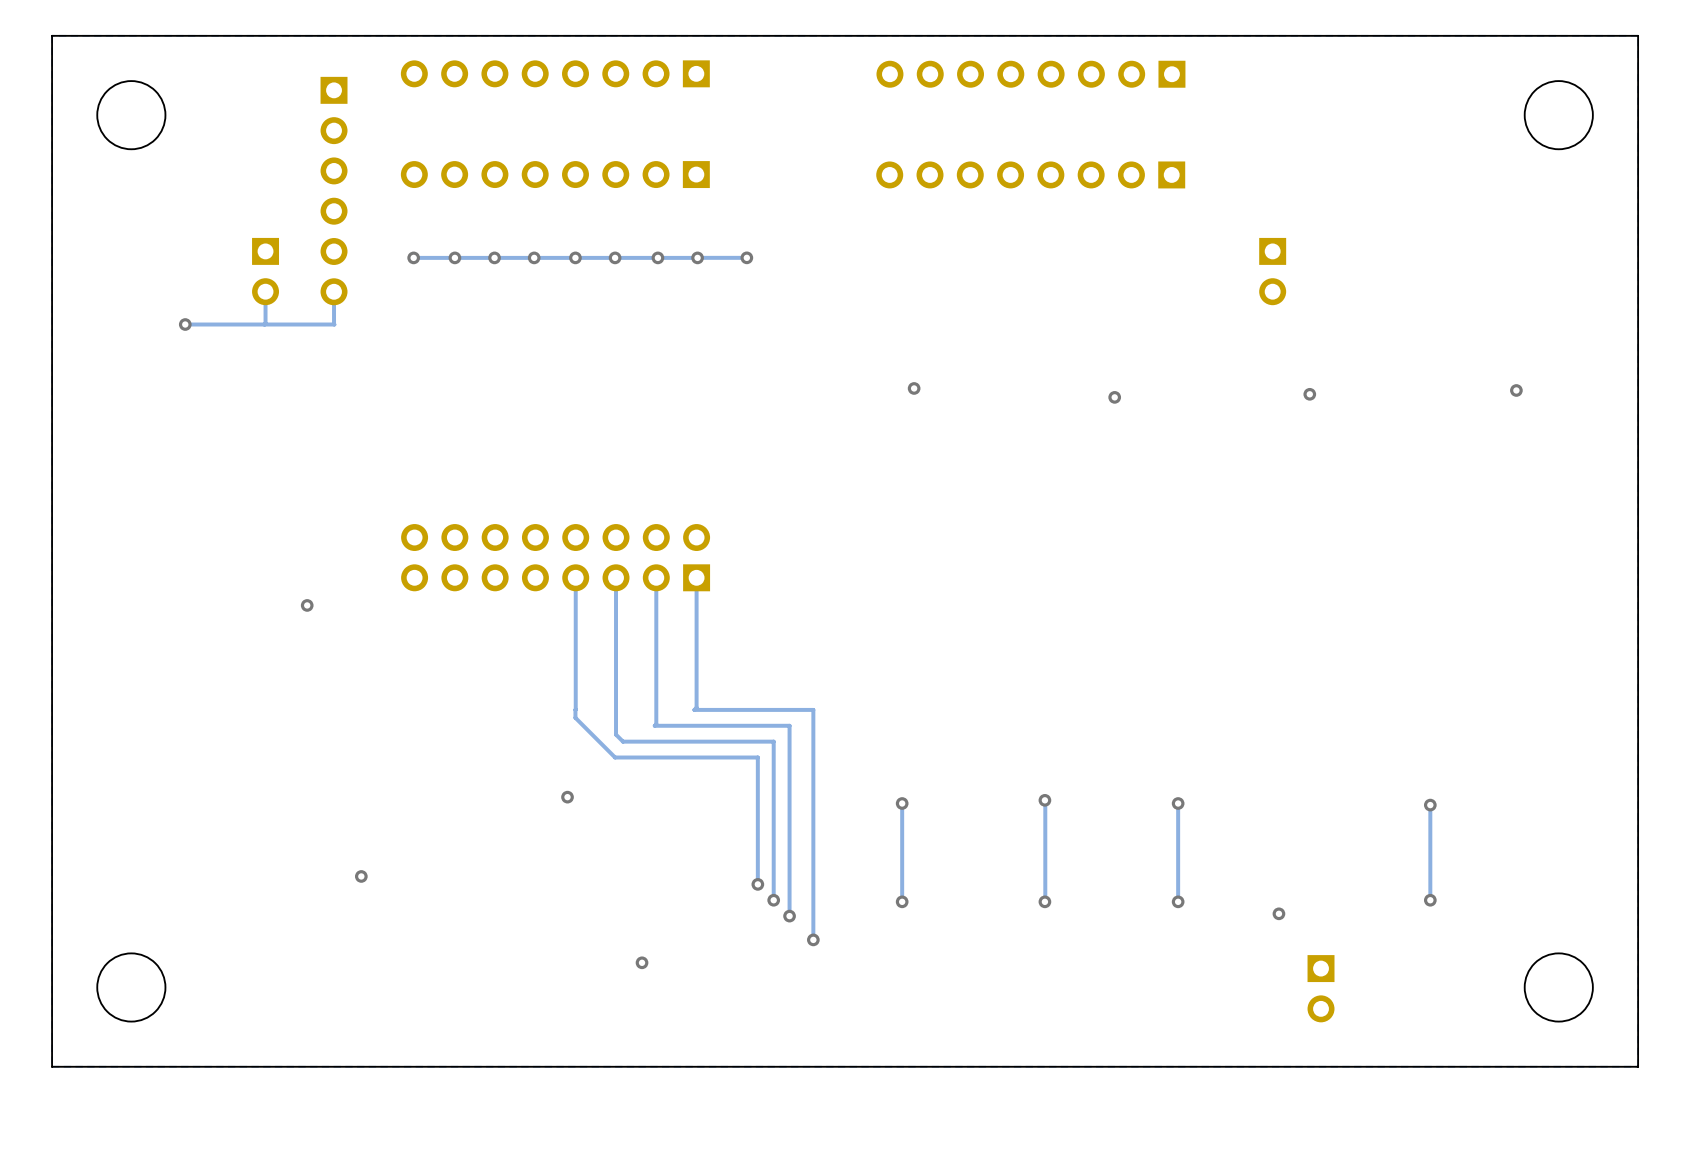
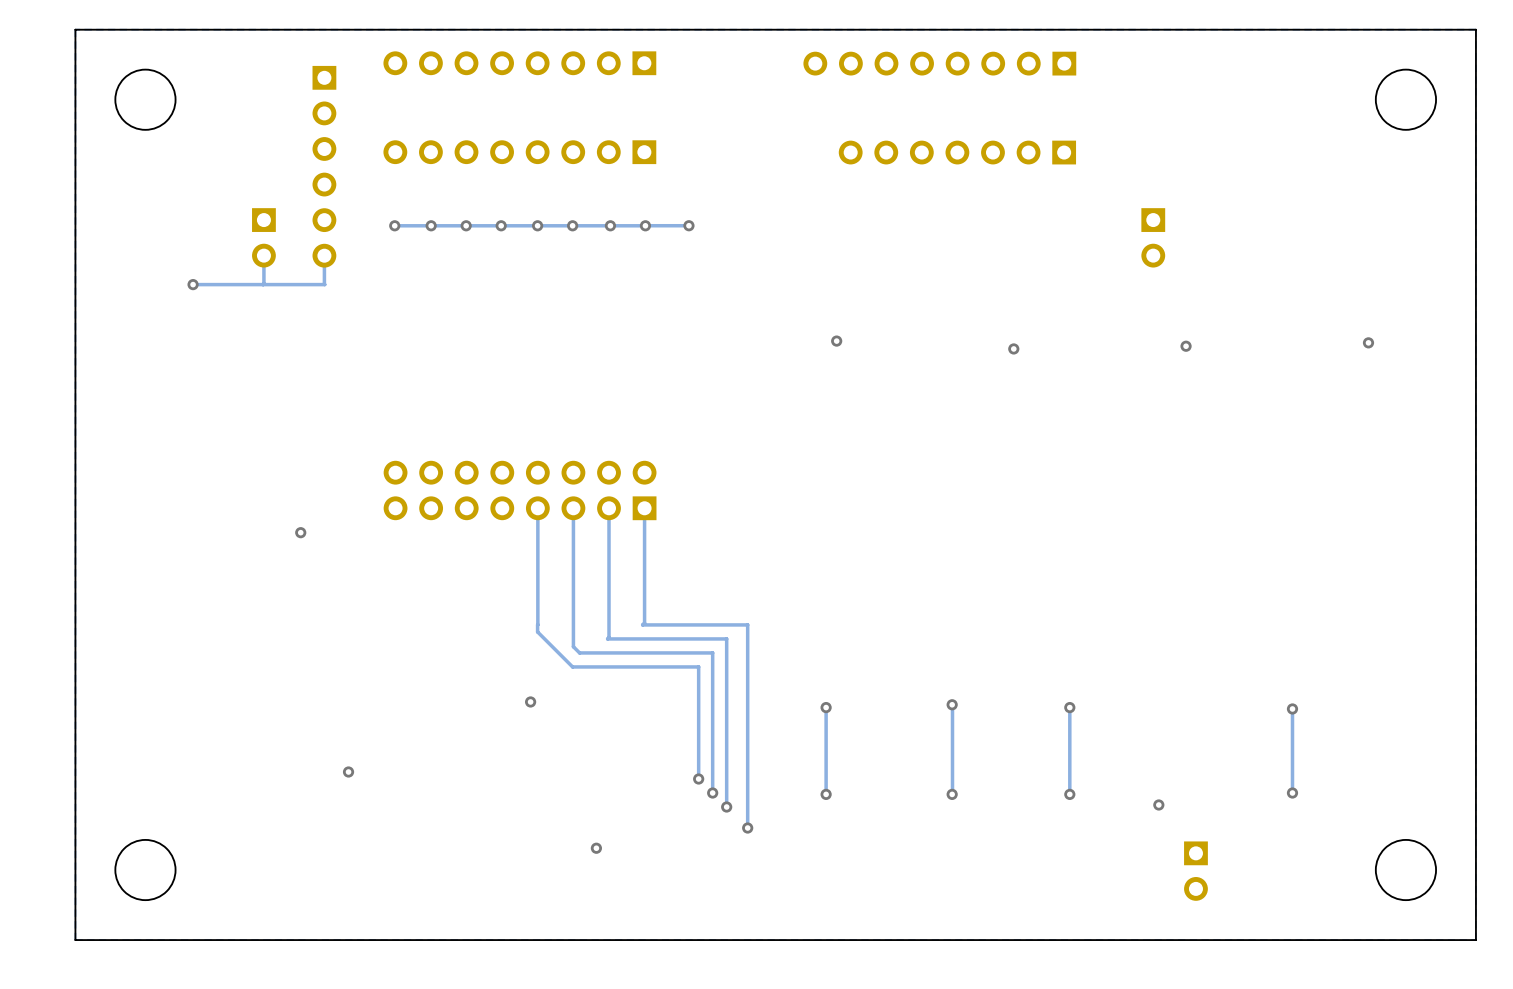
part: (1030, 174) -> none

